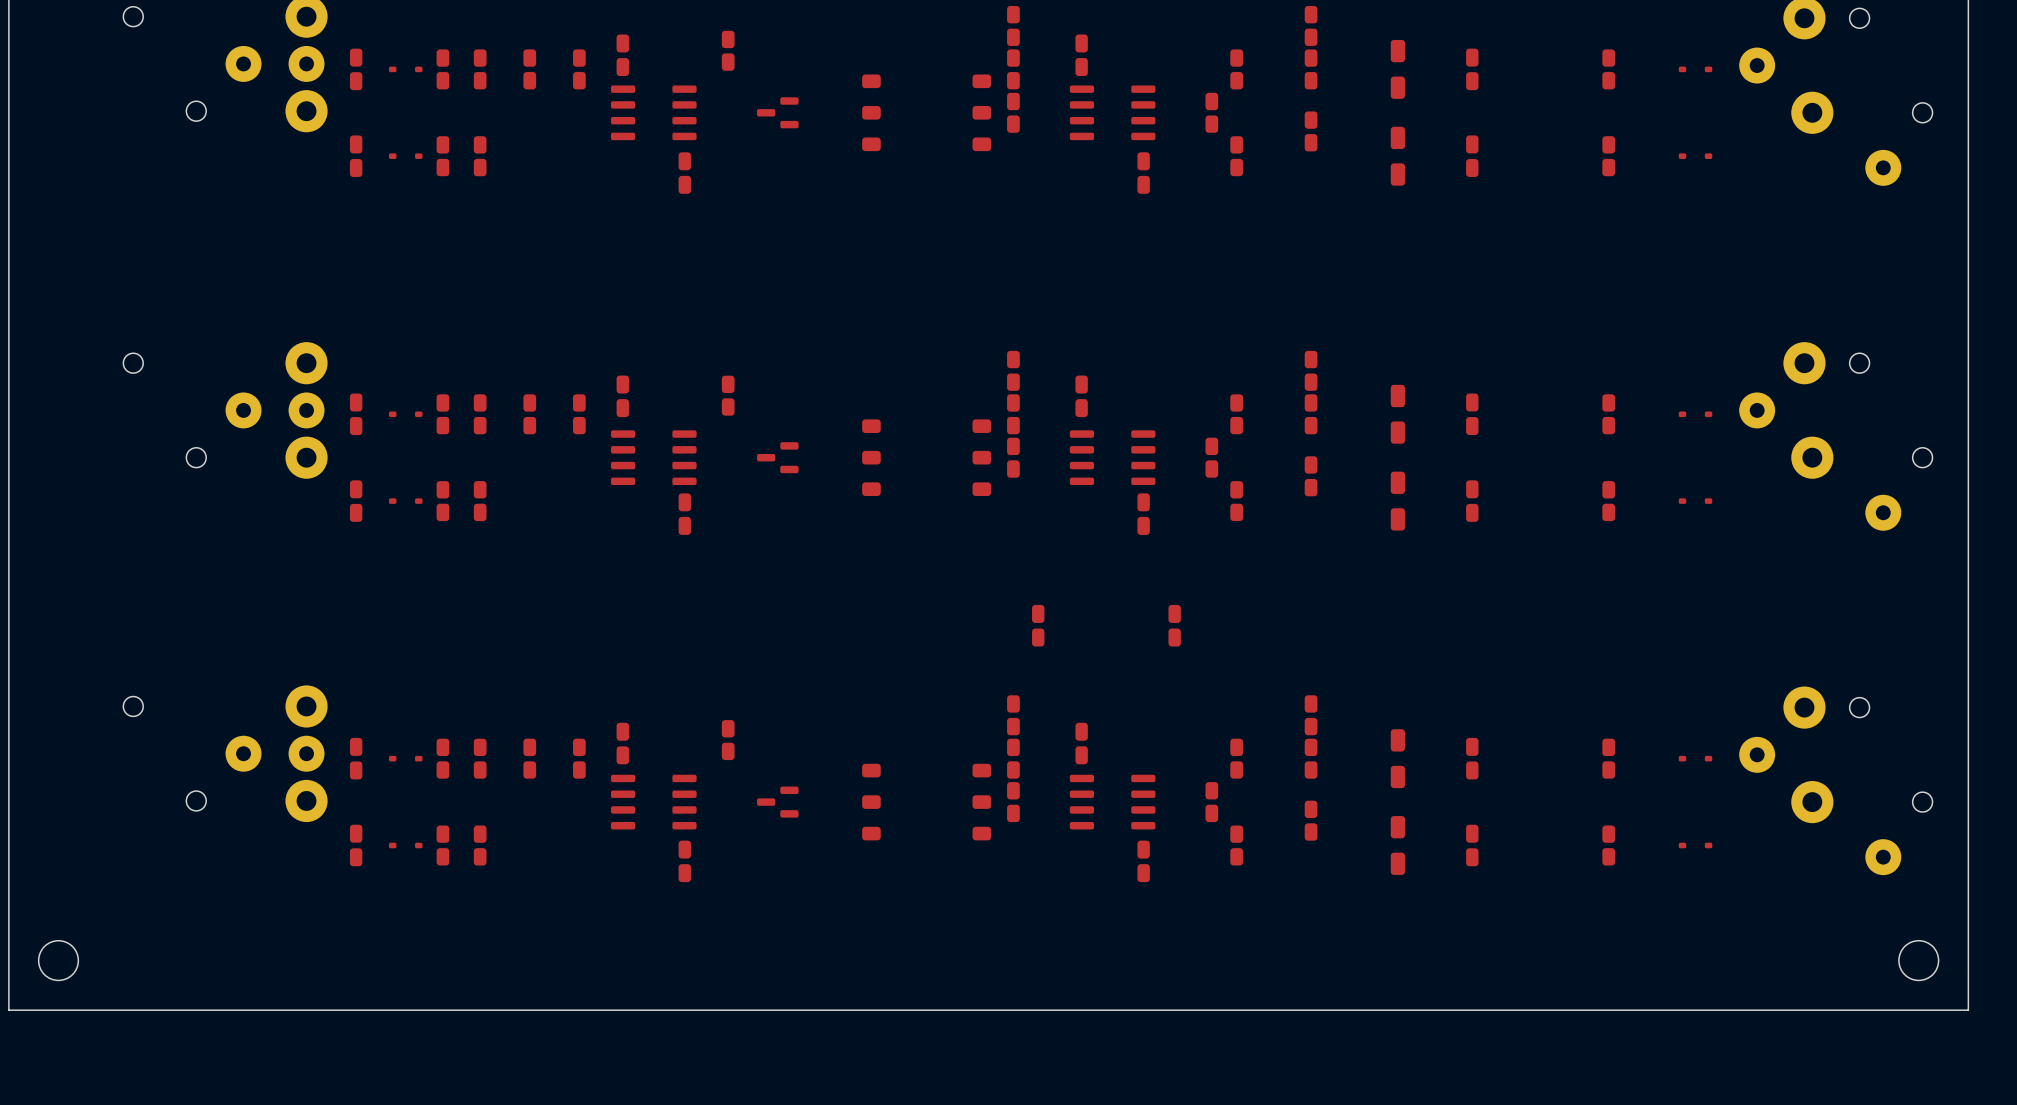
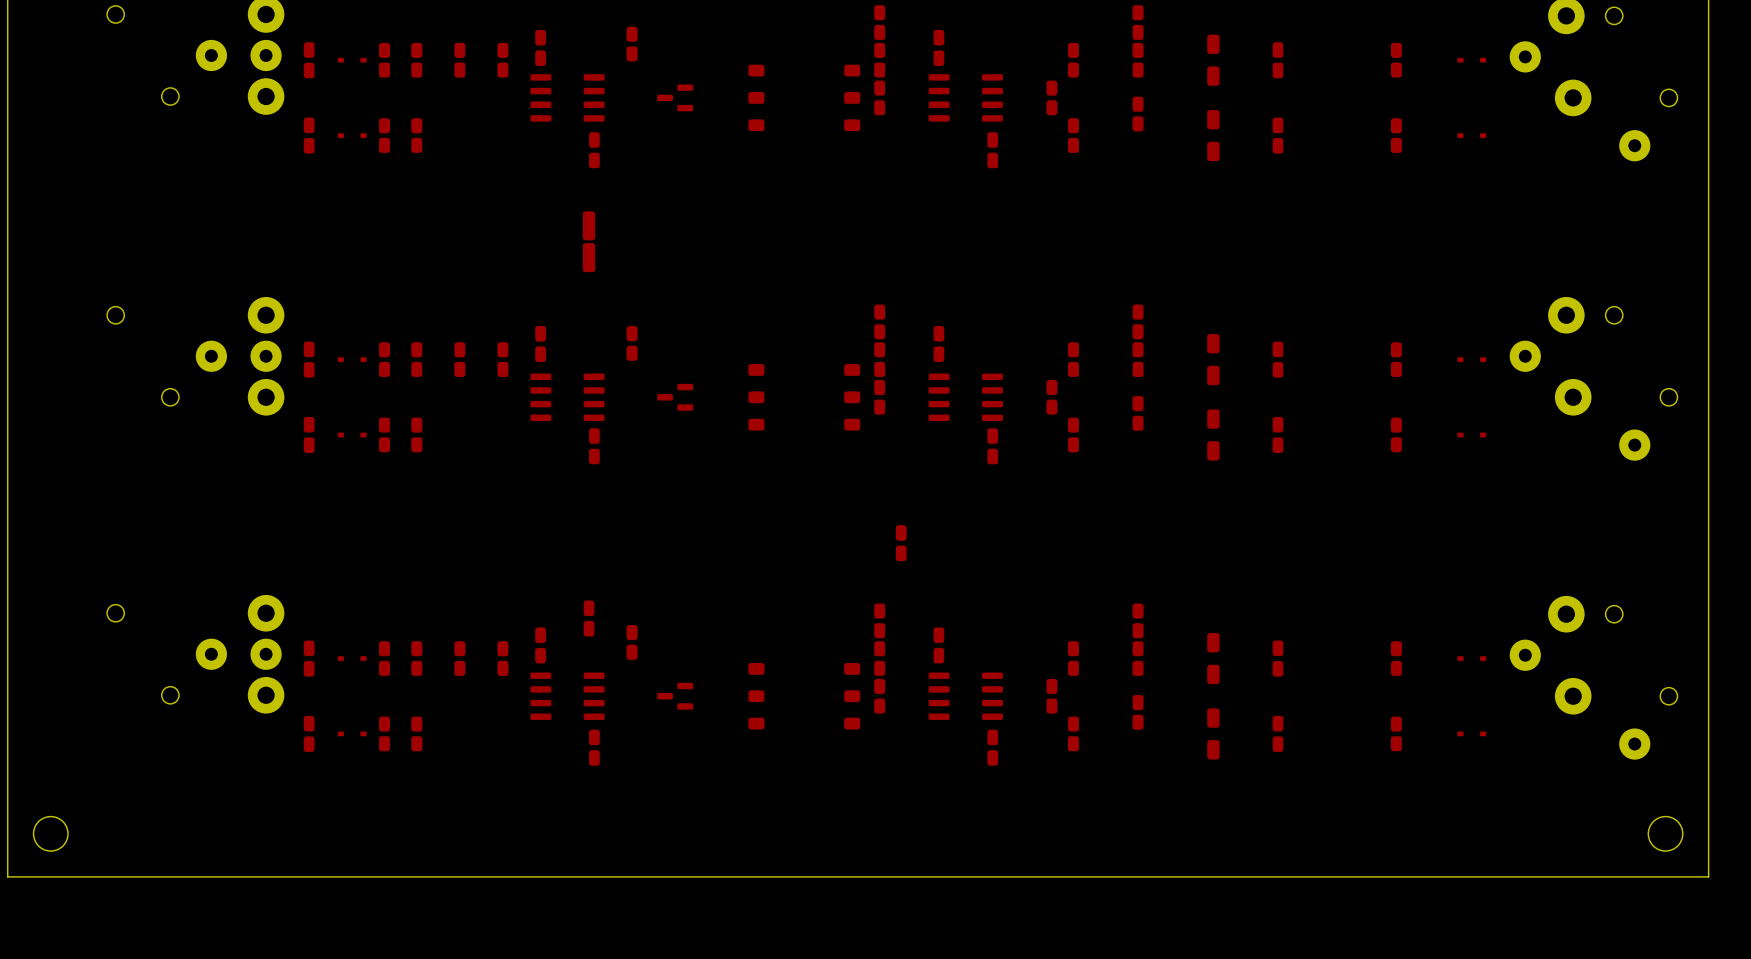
part: none -> (589, 241)
part: (1174, 625) -> none
part: none -> (589, 618)

